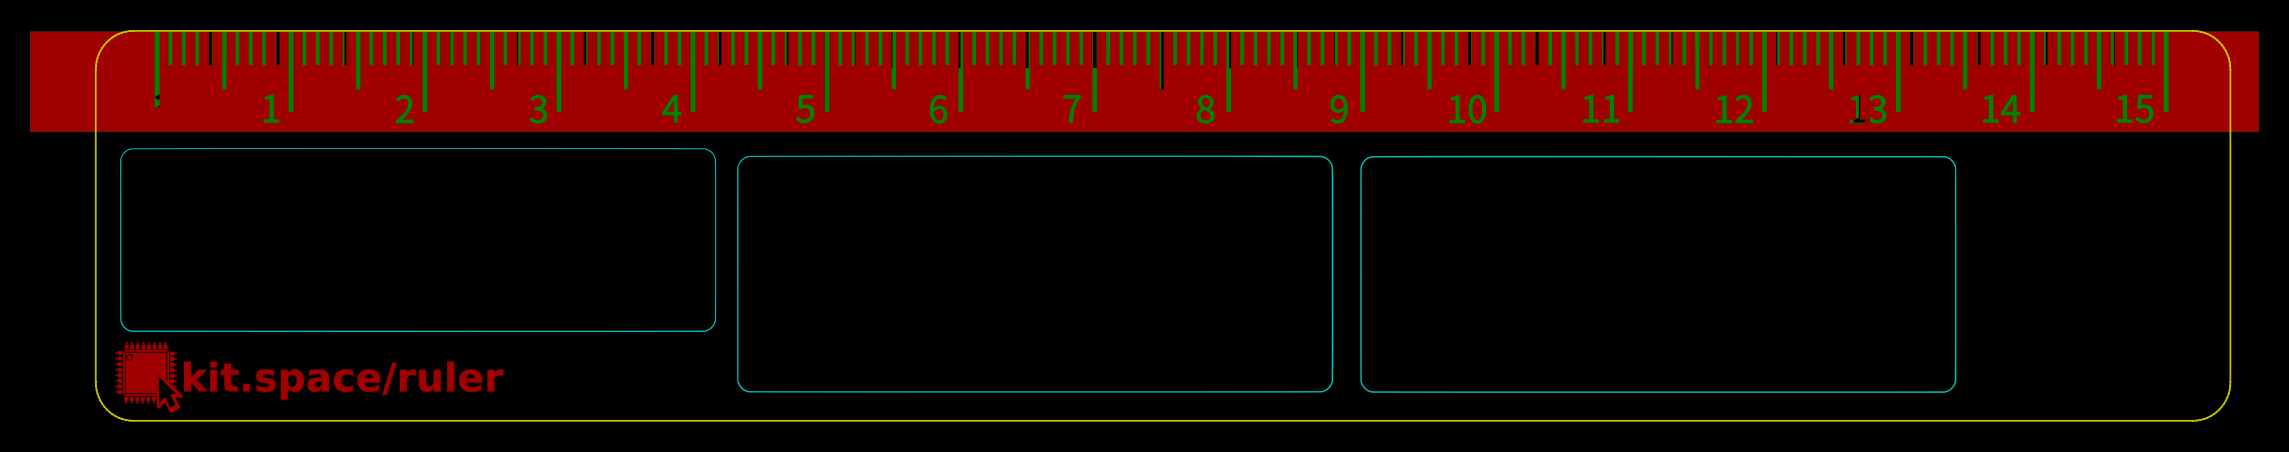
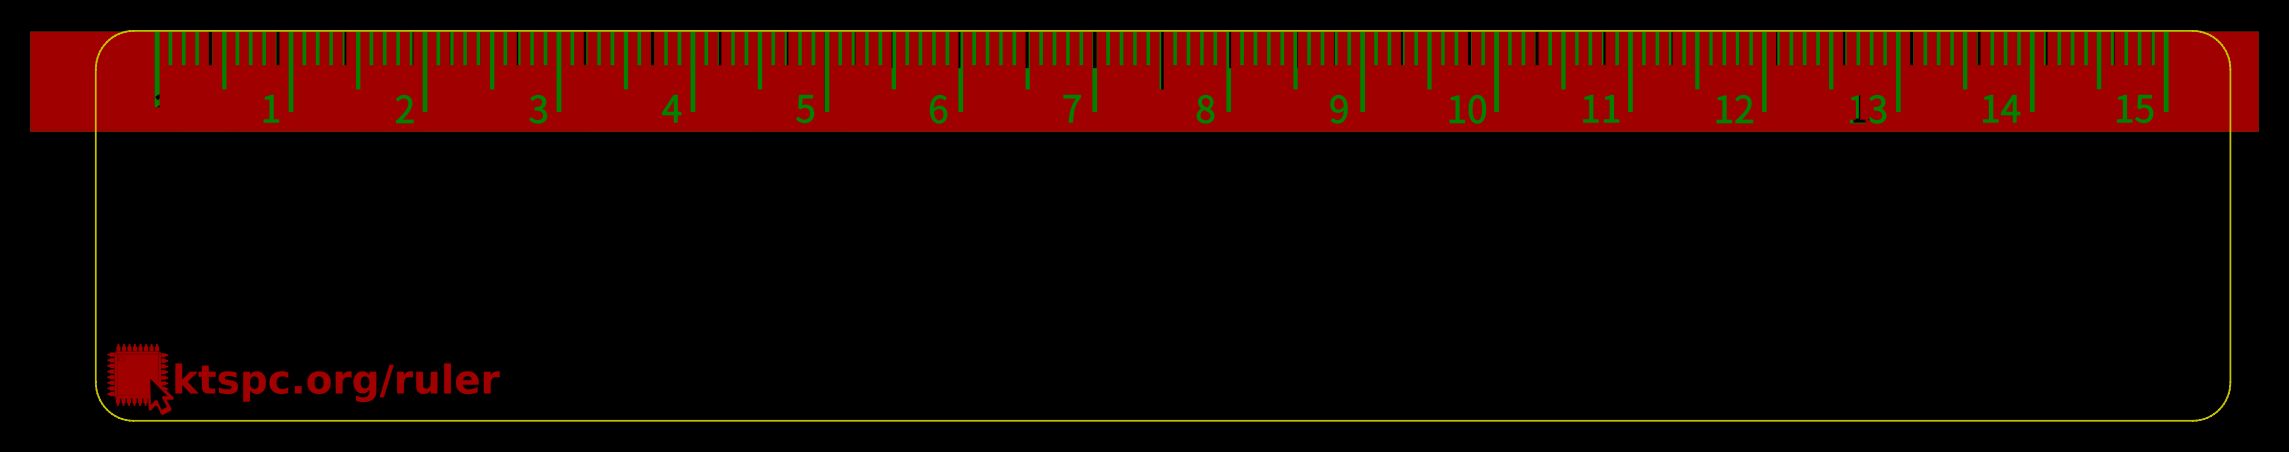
drawing shape: [30, 31, 2259, 413] -> [30, 31, 2259, 415]
drawing: [120, 148, 1957, 393] -> none

